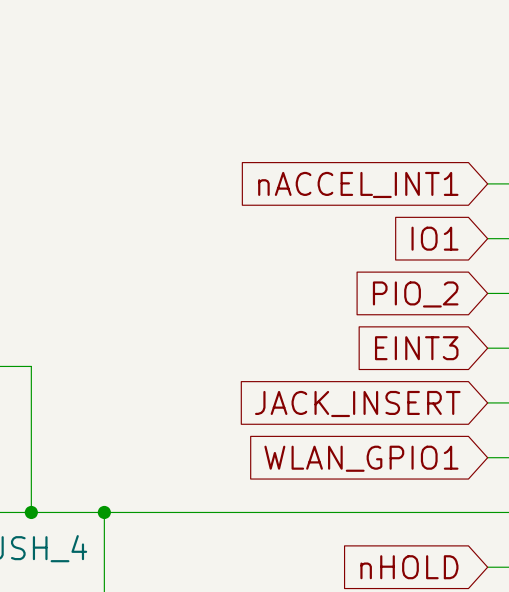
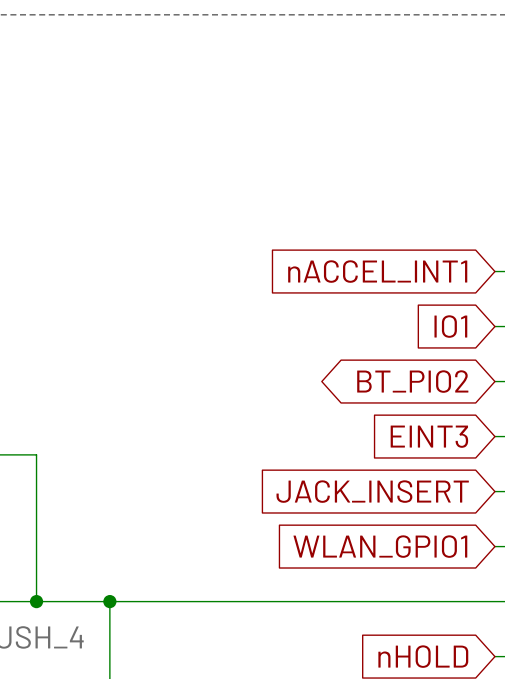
global label shape: input (415, 294) -> bidirectional (412, 381)
global label: PIO_2 (415, 294) -> BT_PIO2 (412, 381)

